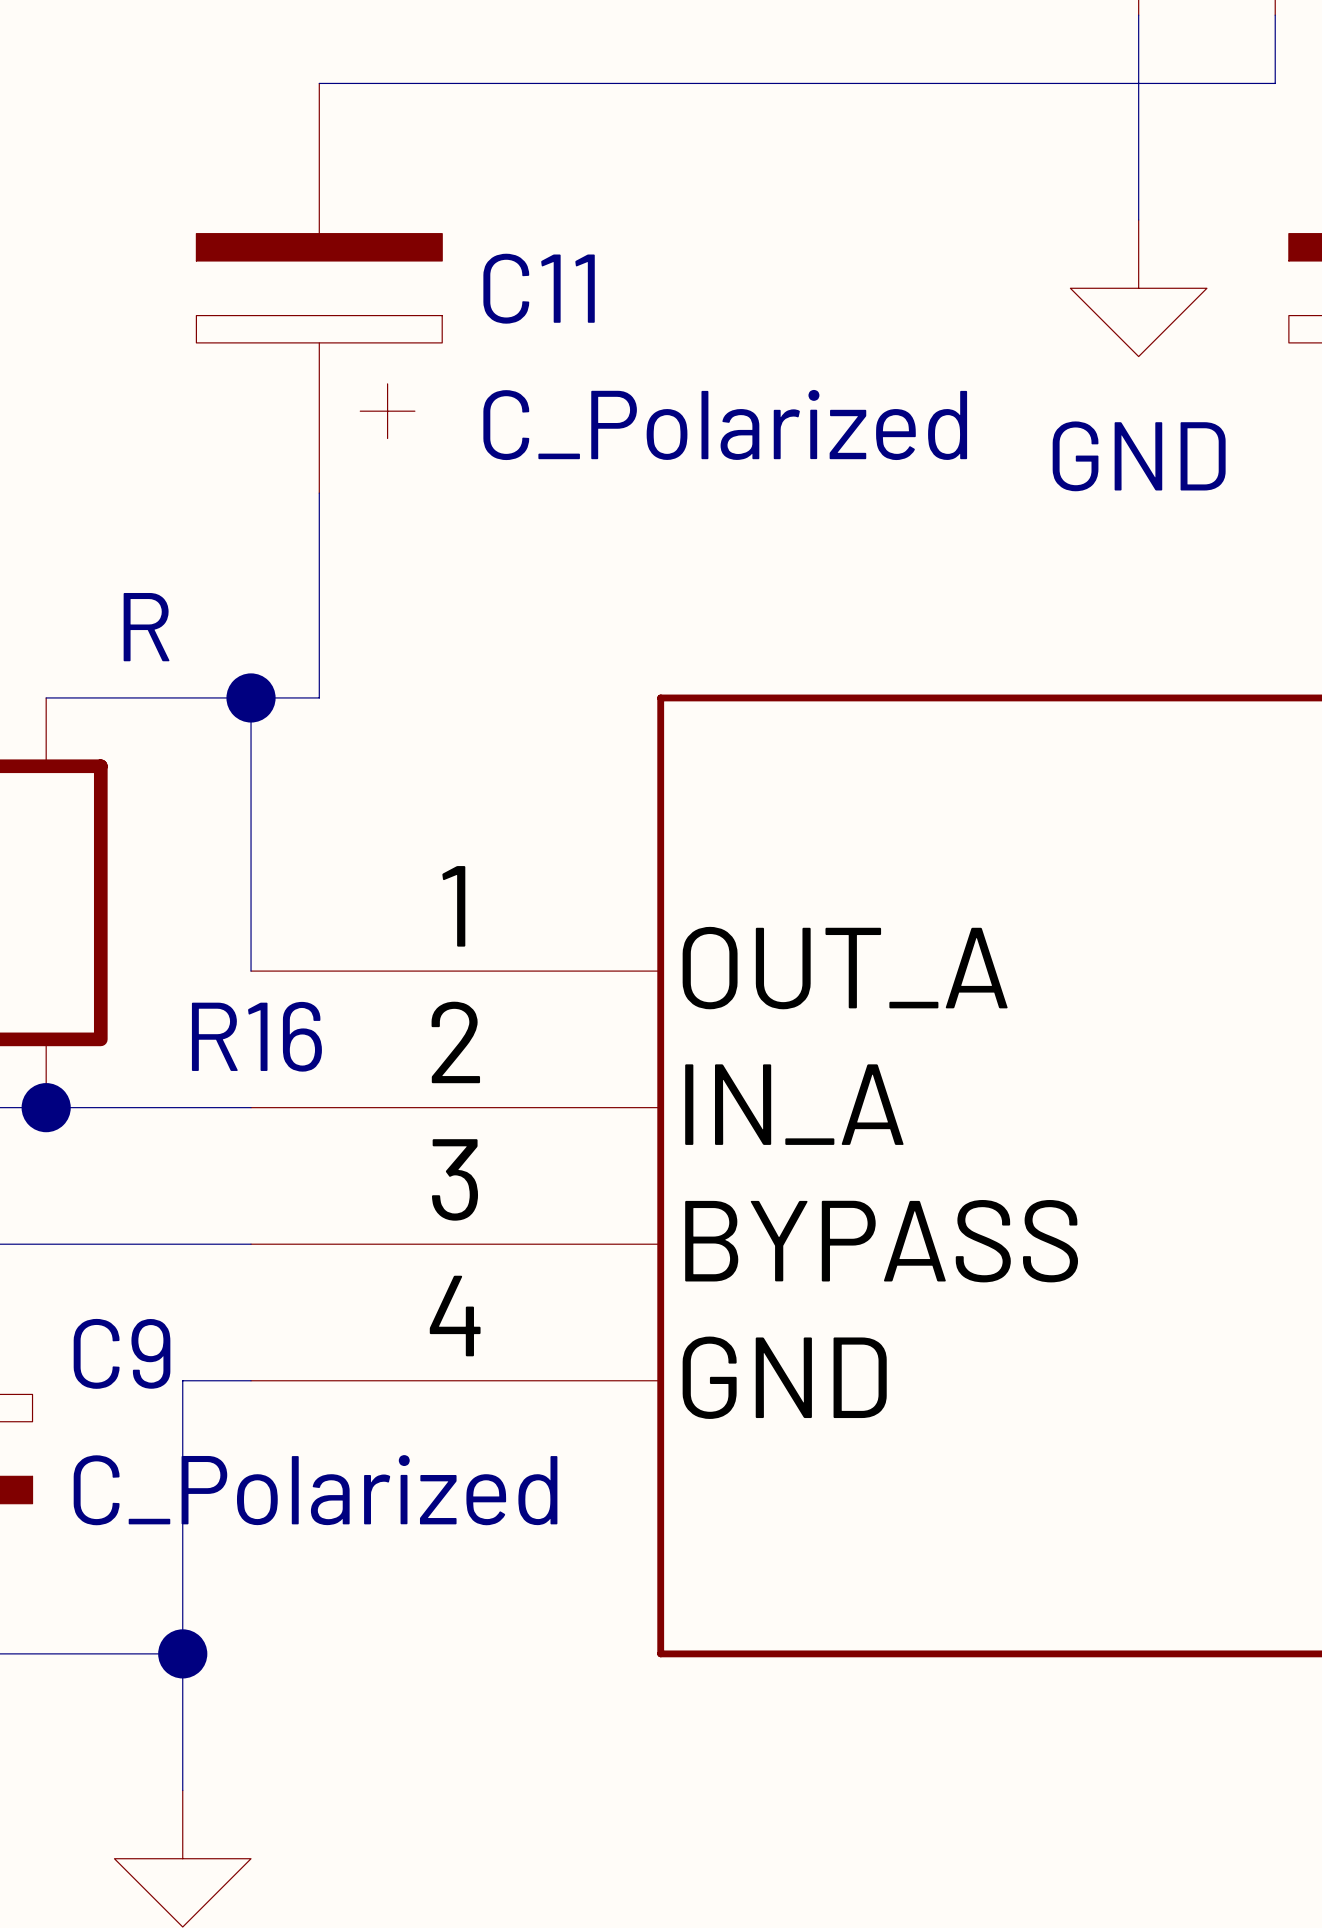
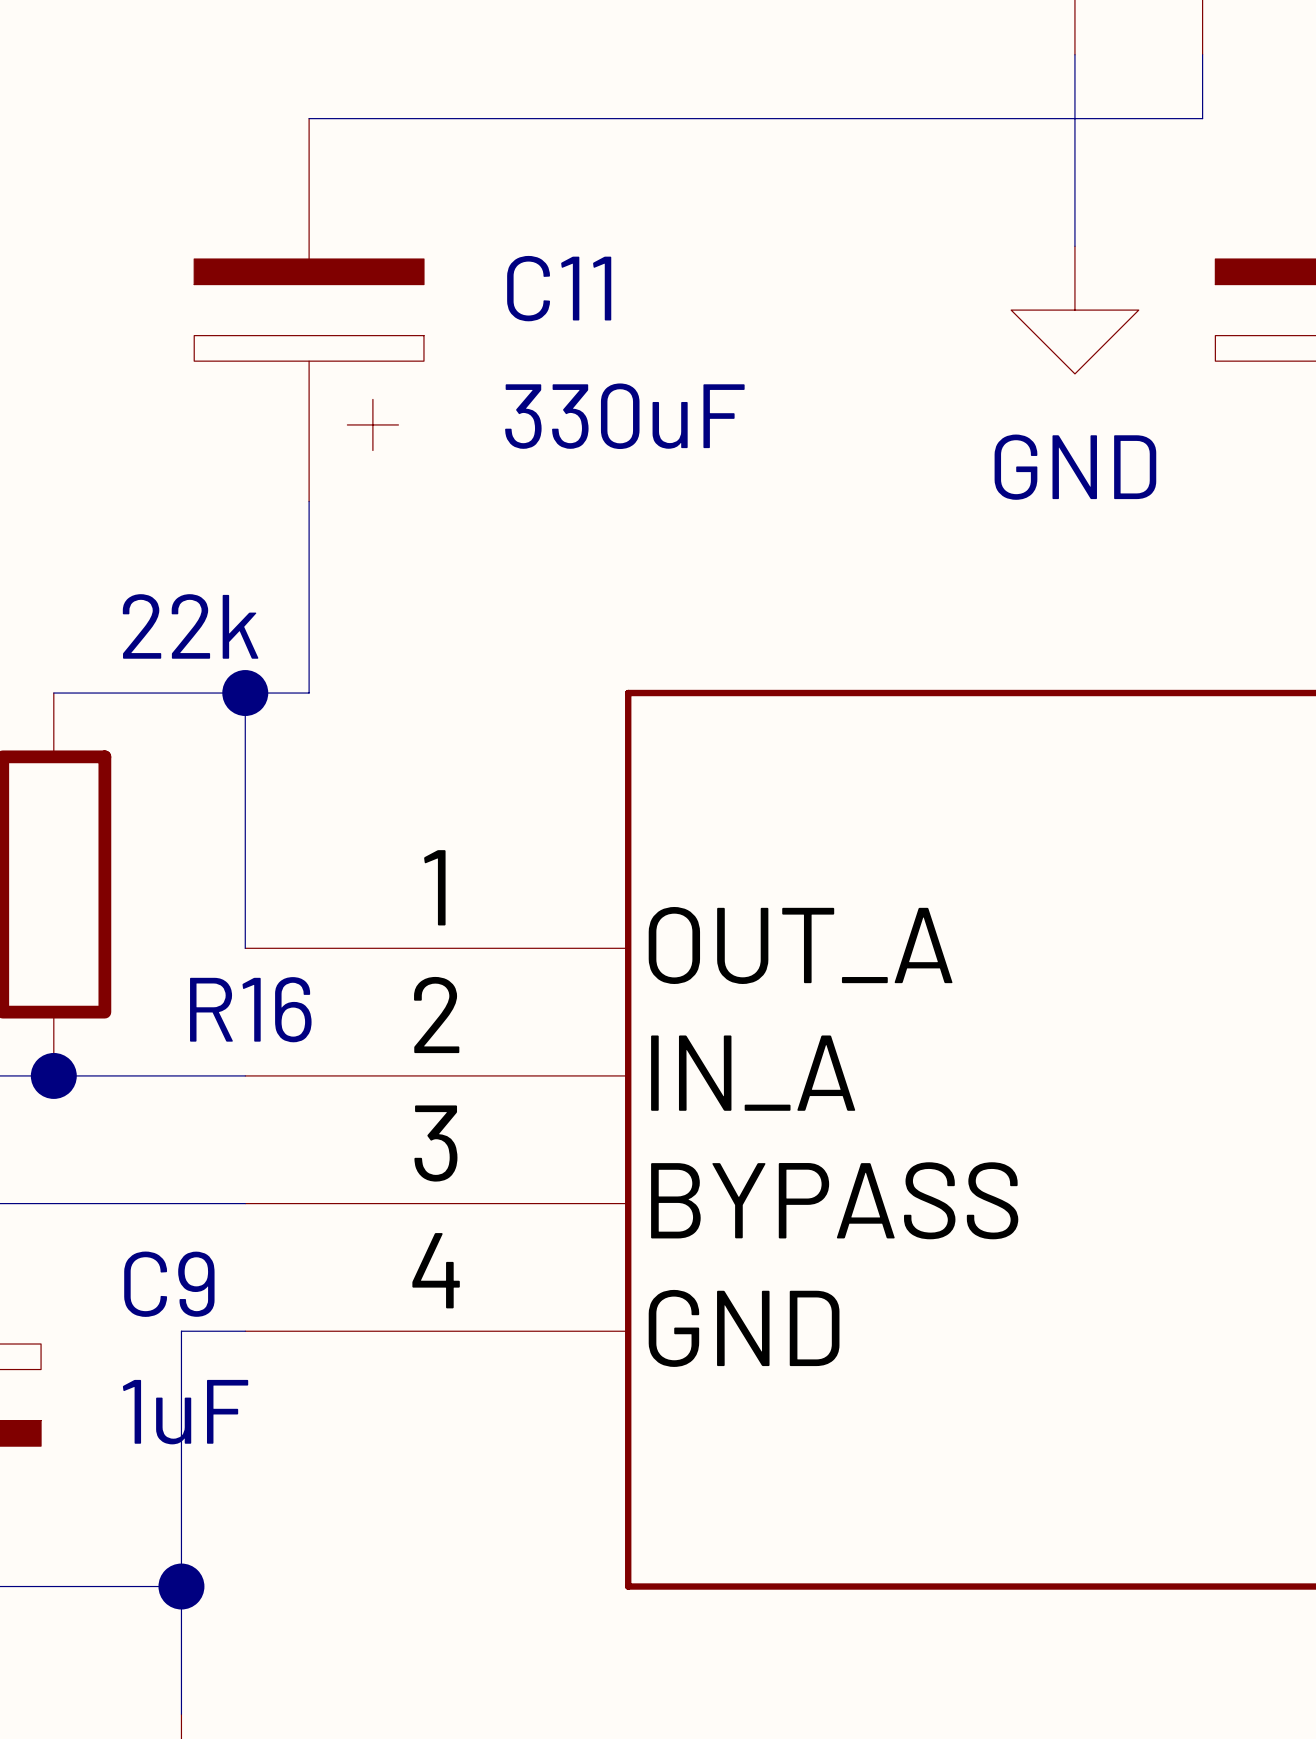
C11 name position: C11 (539, 288) -> C11 (559, 288)
C11 value: C_Polarized (725, 424) -> 330uF (624, 416)
R16 value: R (146, 627) -> 22k (190, 626)
C9 name position: C9 (122, 1353) -> C9 (169, 1284)
C9 value: C_Polarized (315, 1490) -> 1uF (185, 1412)

